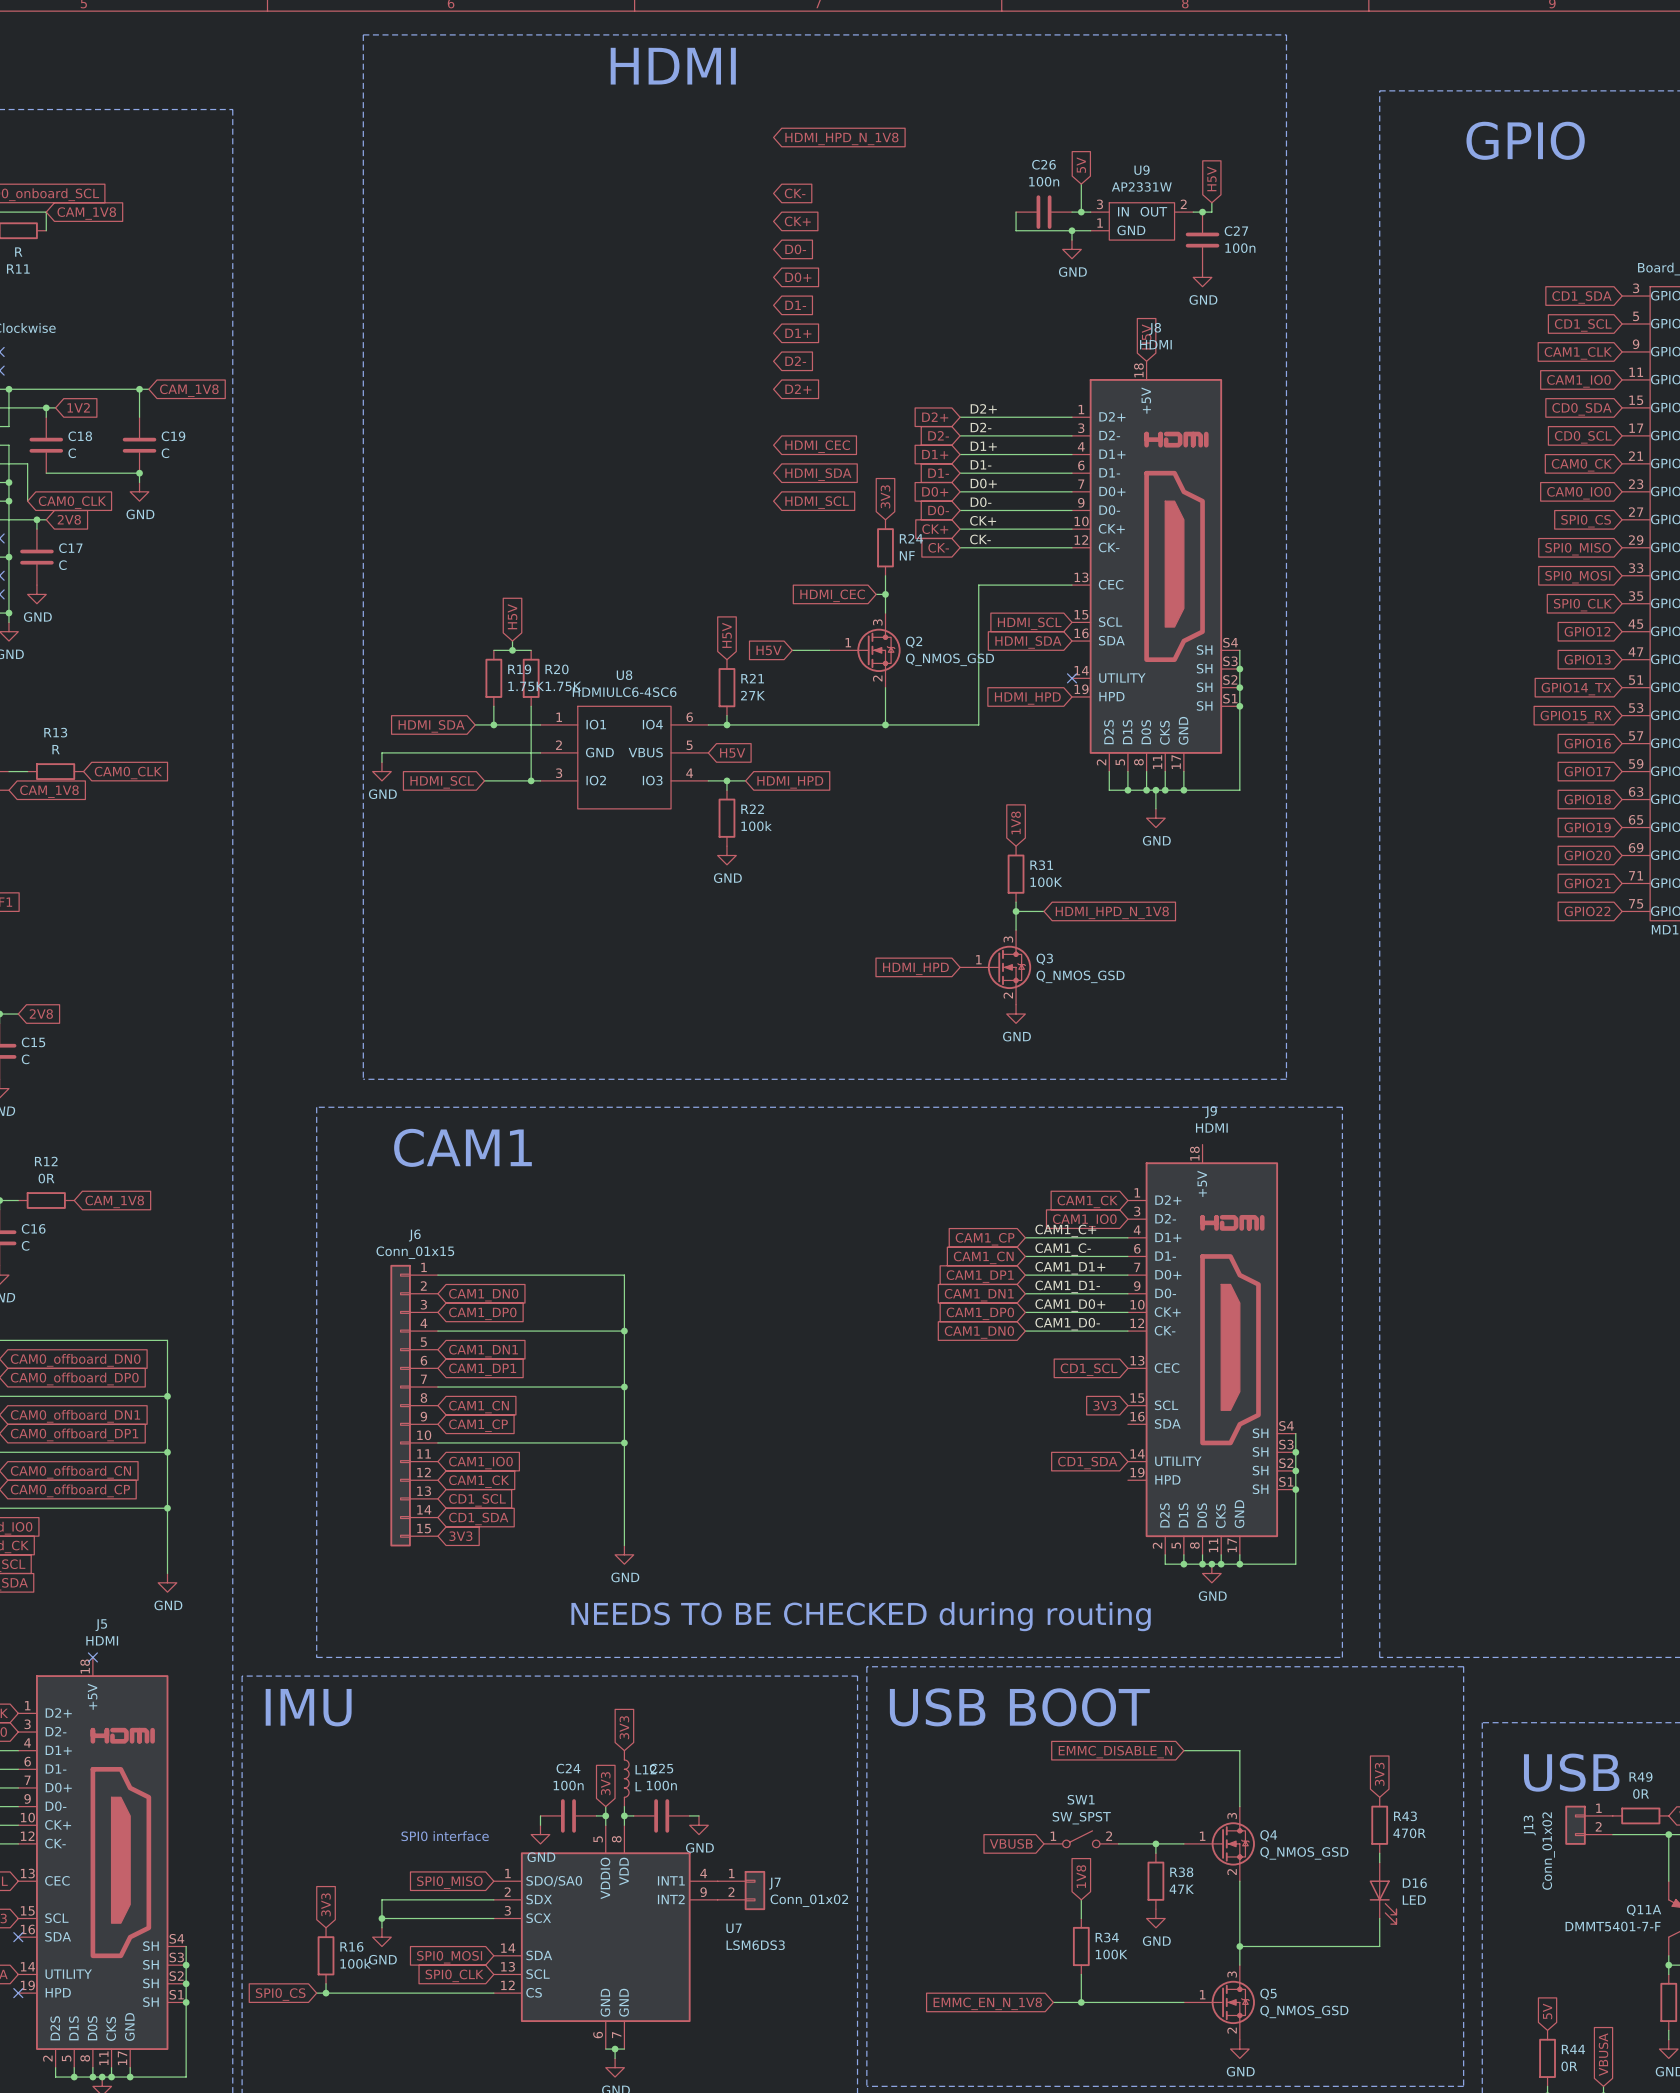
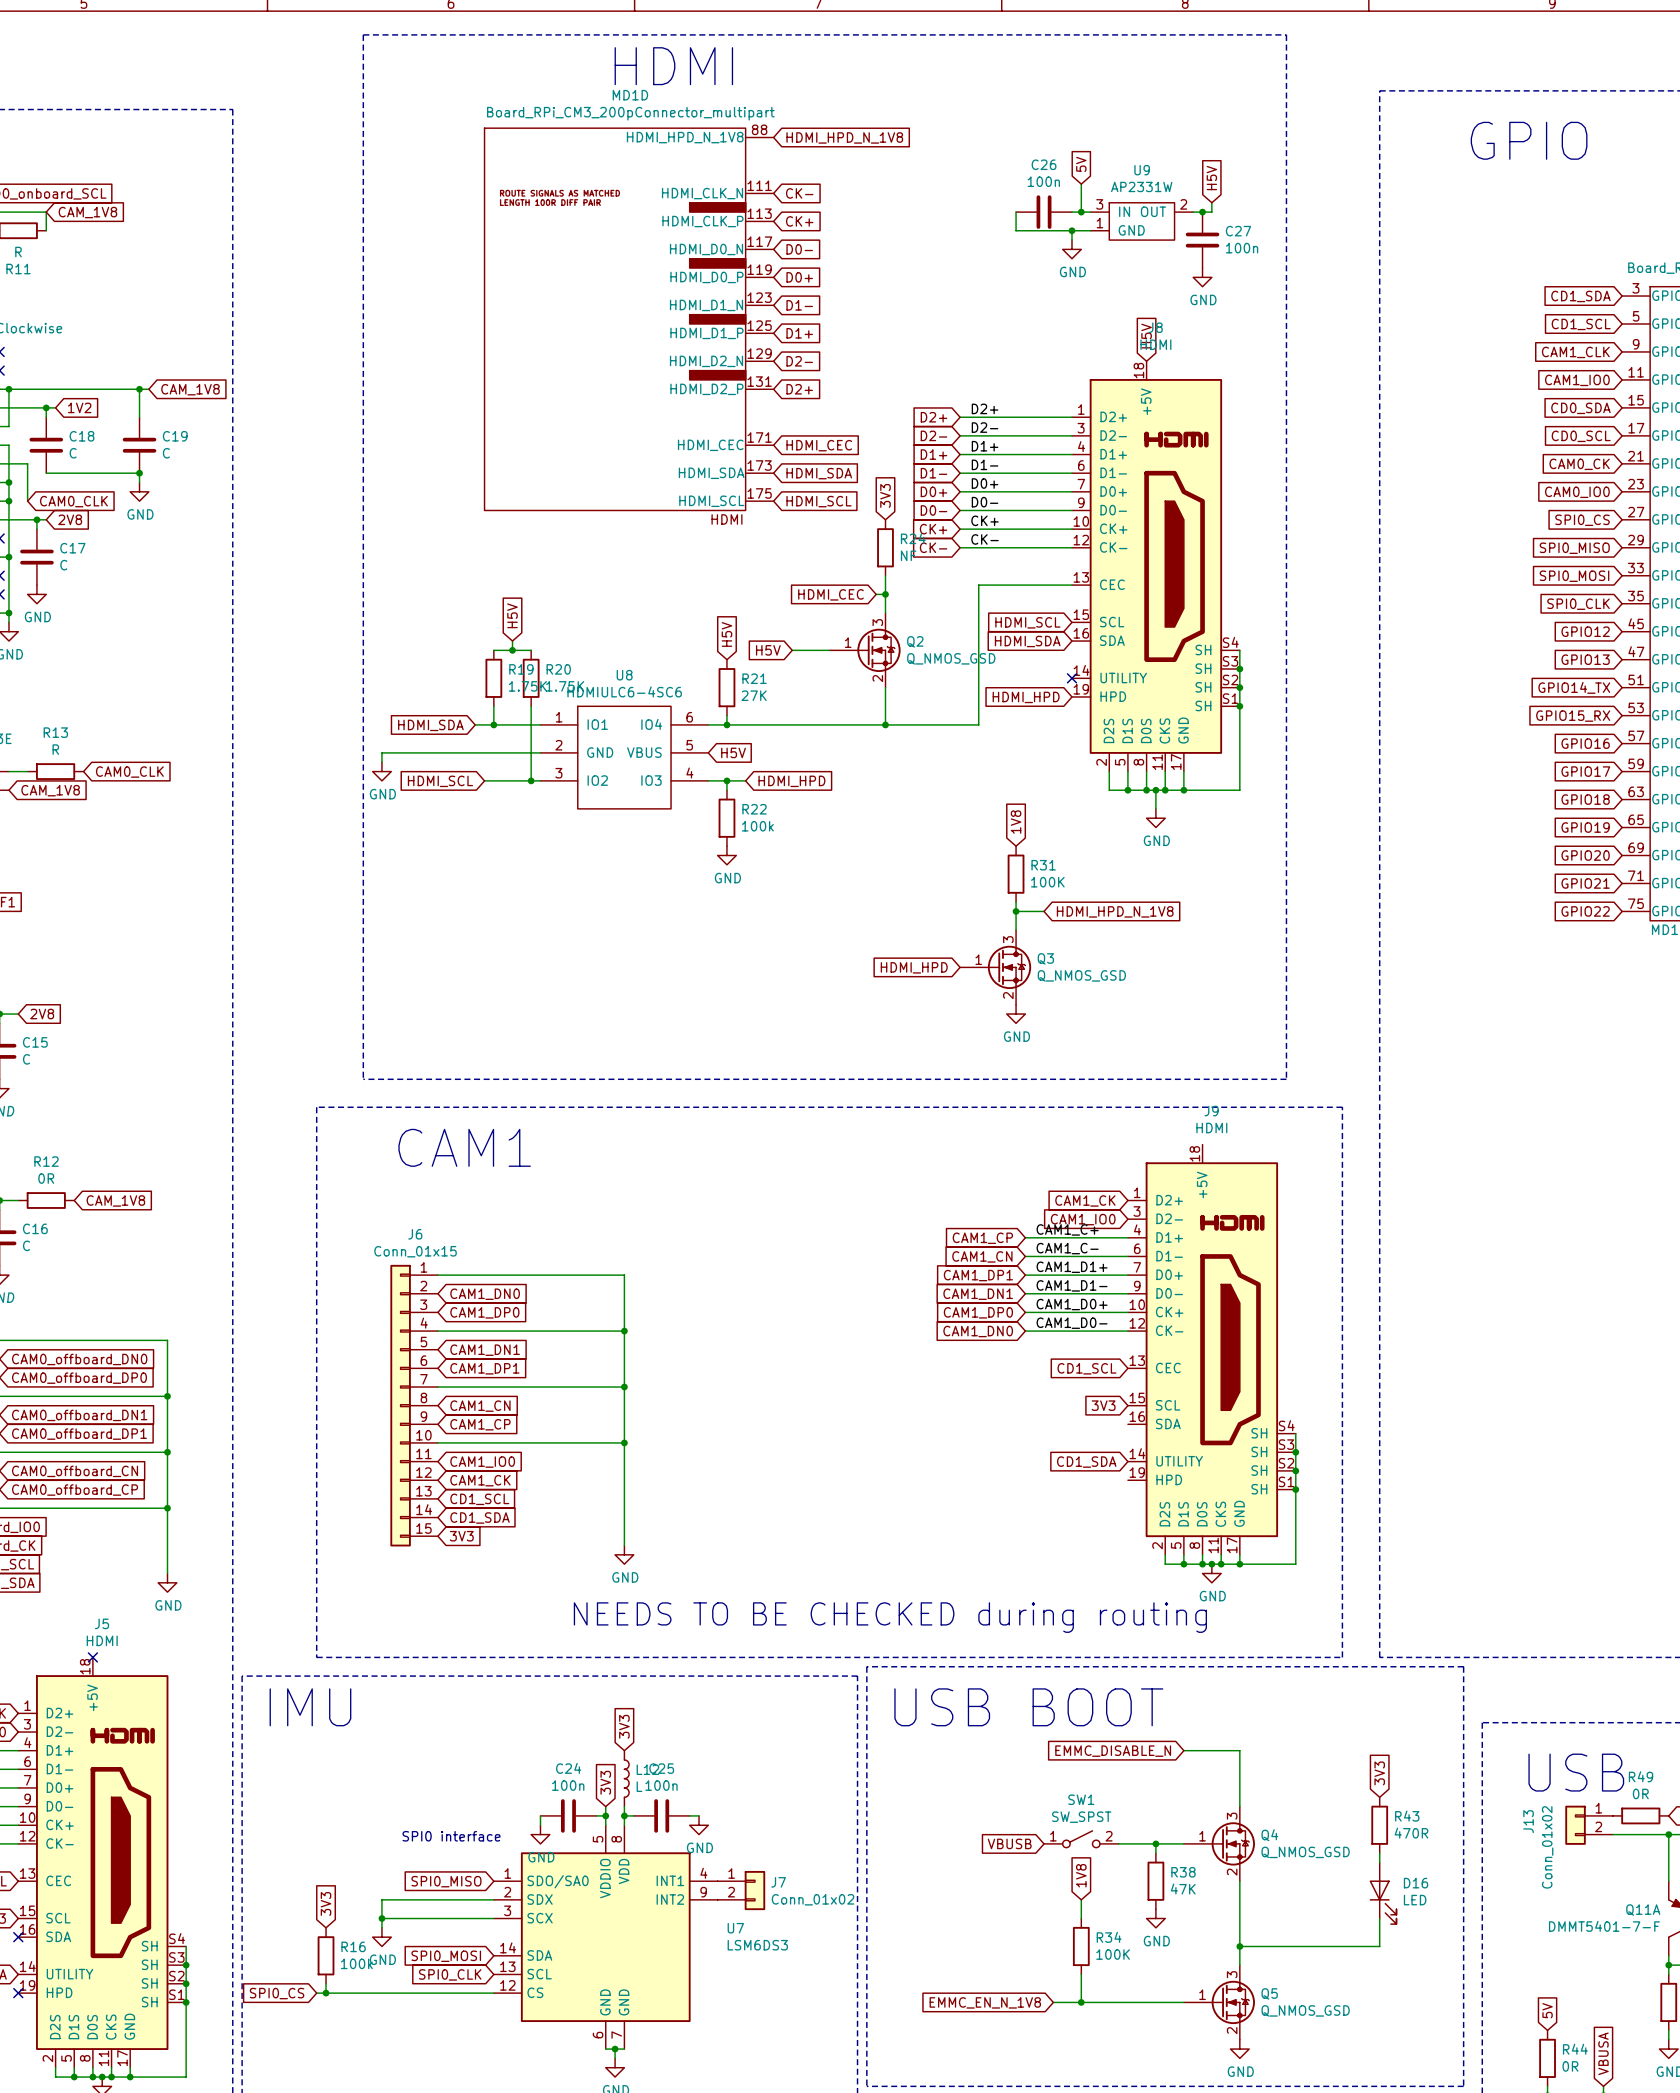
MD1D: none -> Board_RPi_CM3_200pConnector_multipart (629, 319)

